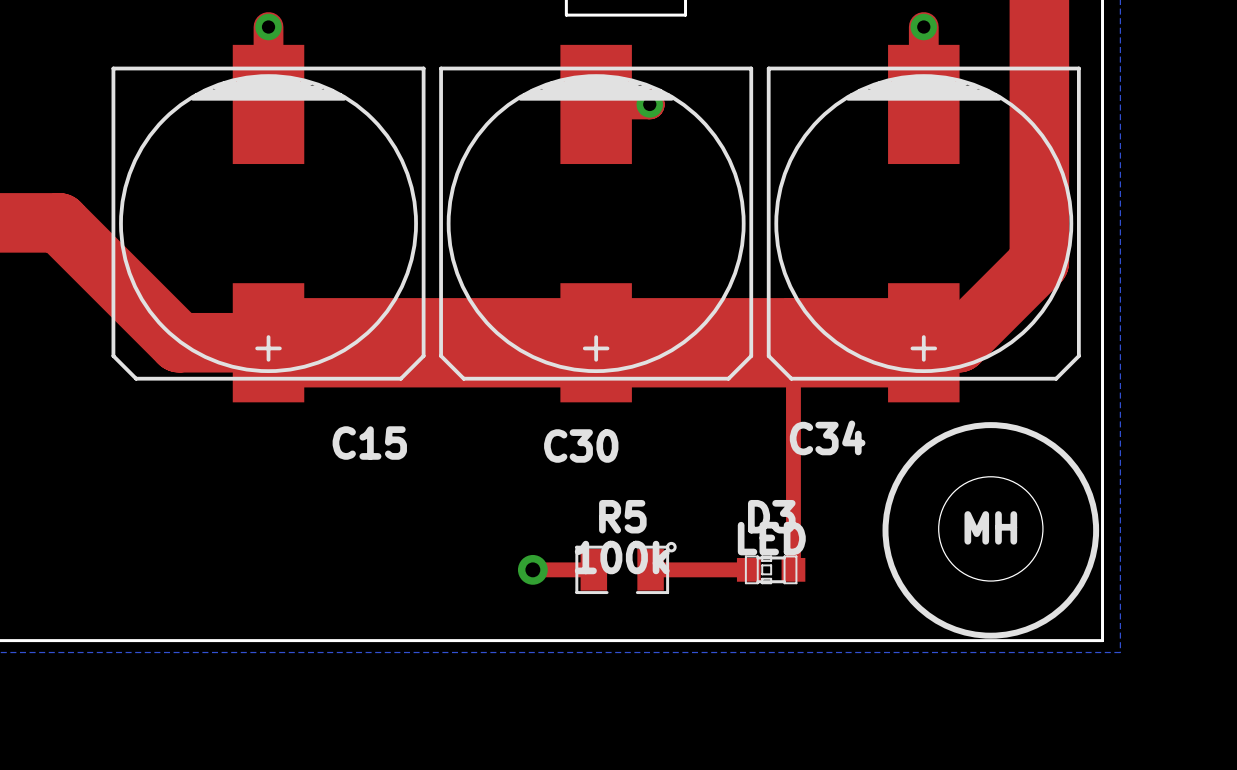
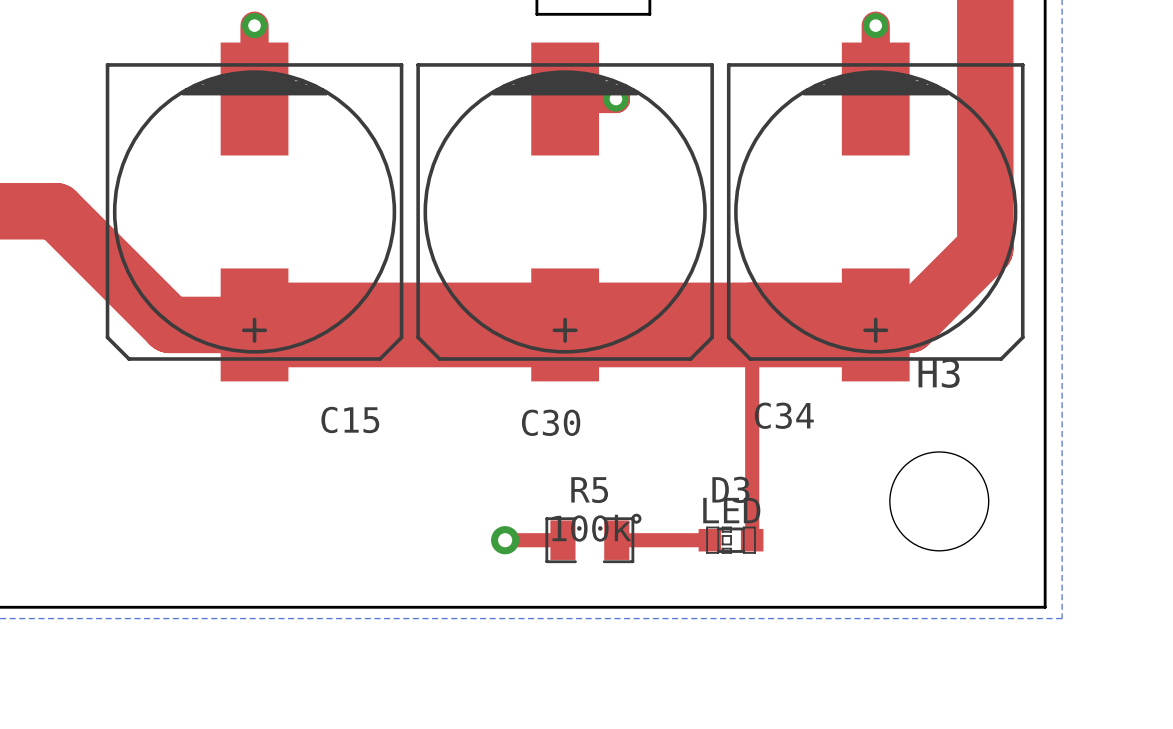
drawing: [882, 422, 1100, 639] -> none
MH name: MH (990, 527) -> H3 (939, 373)

